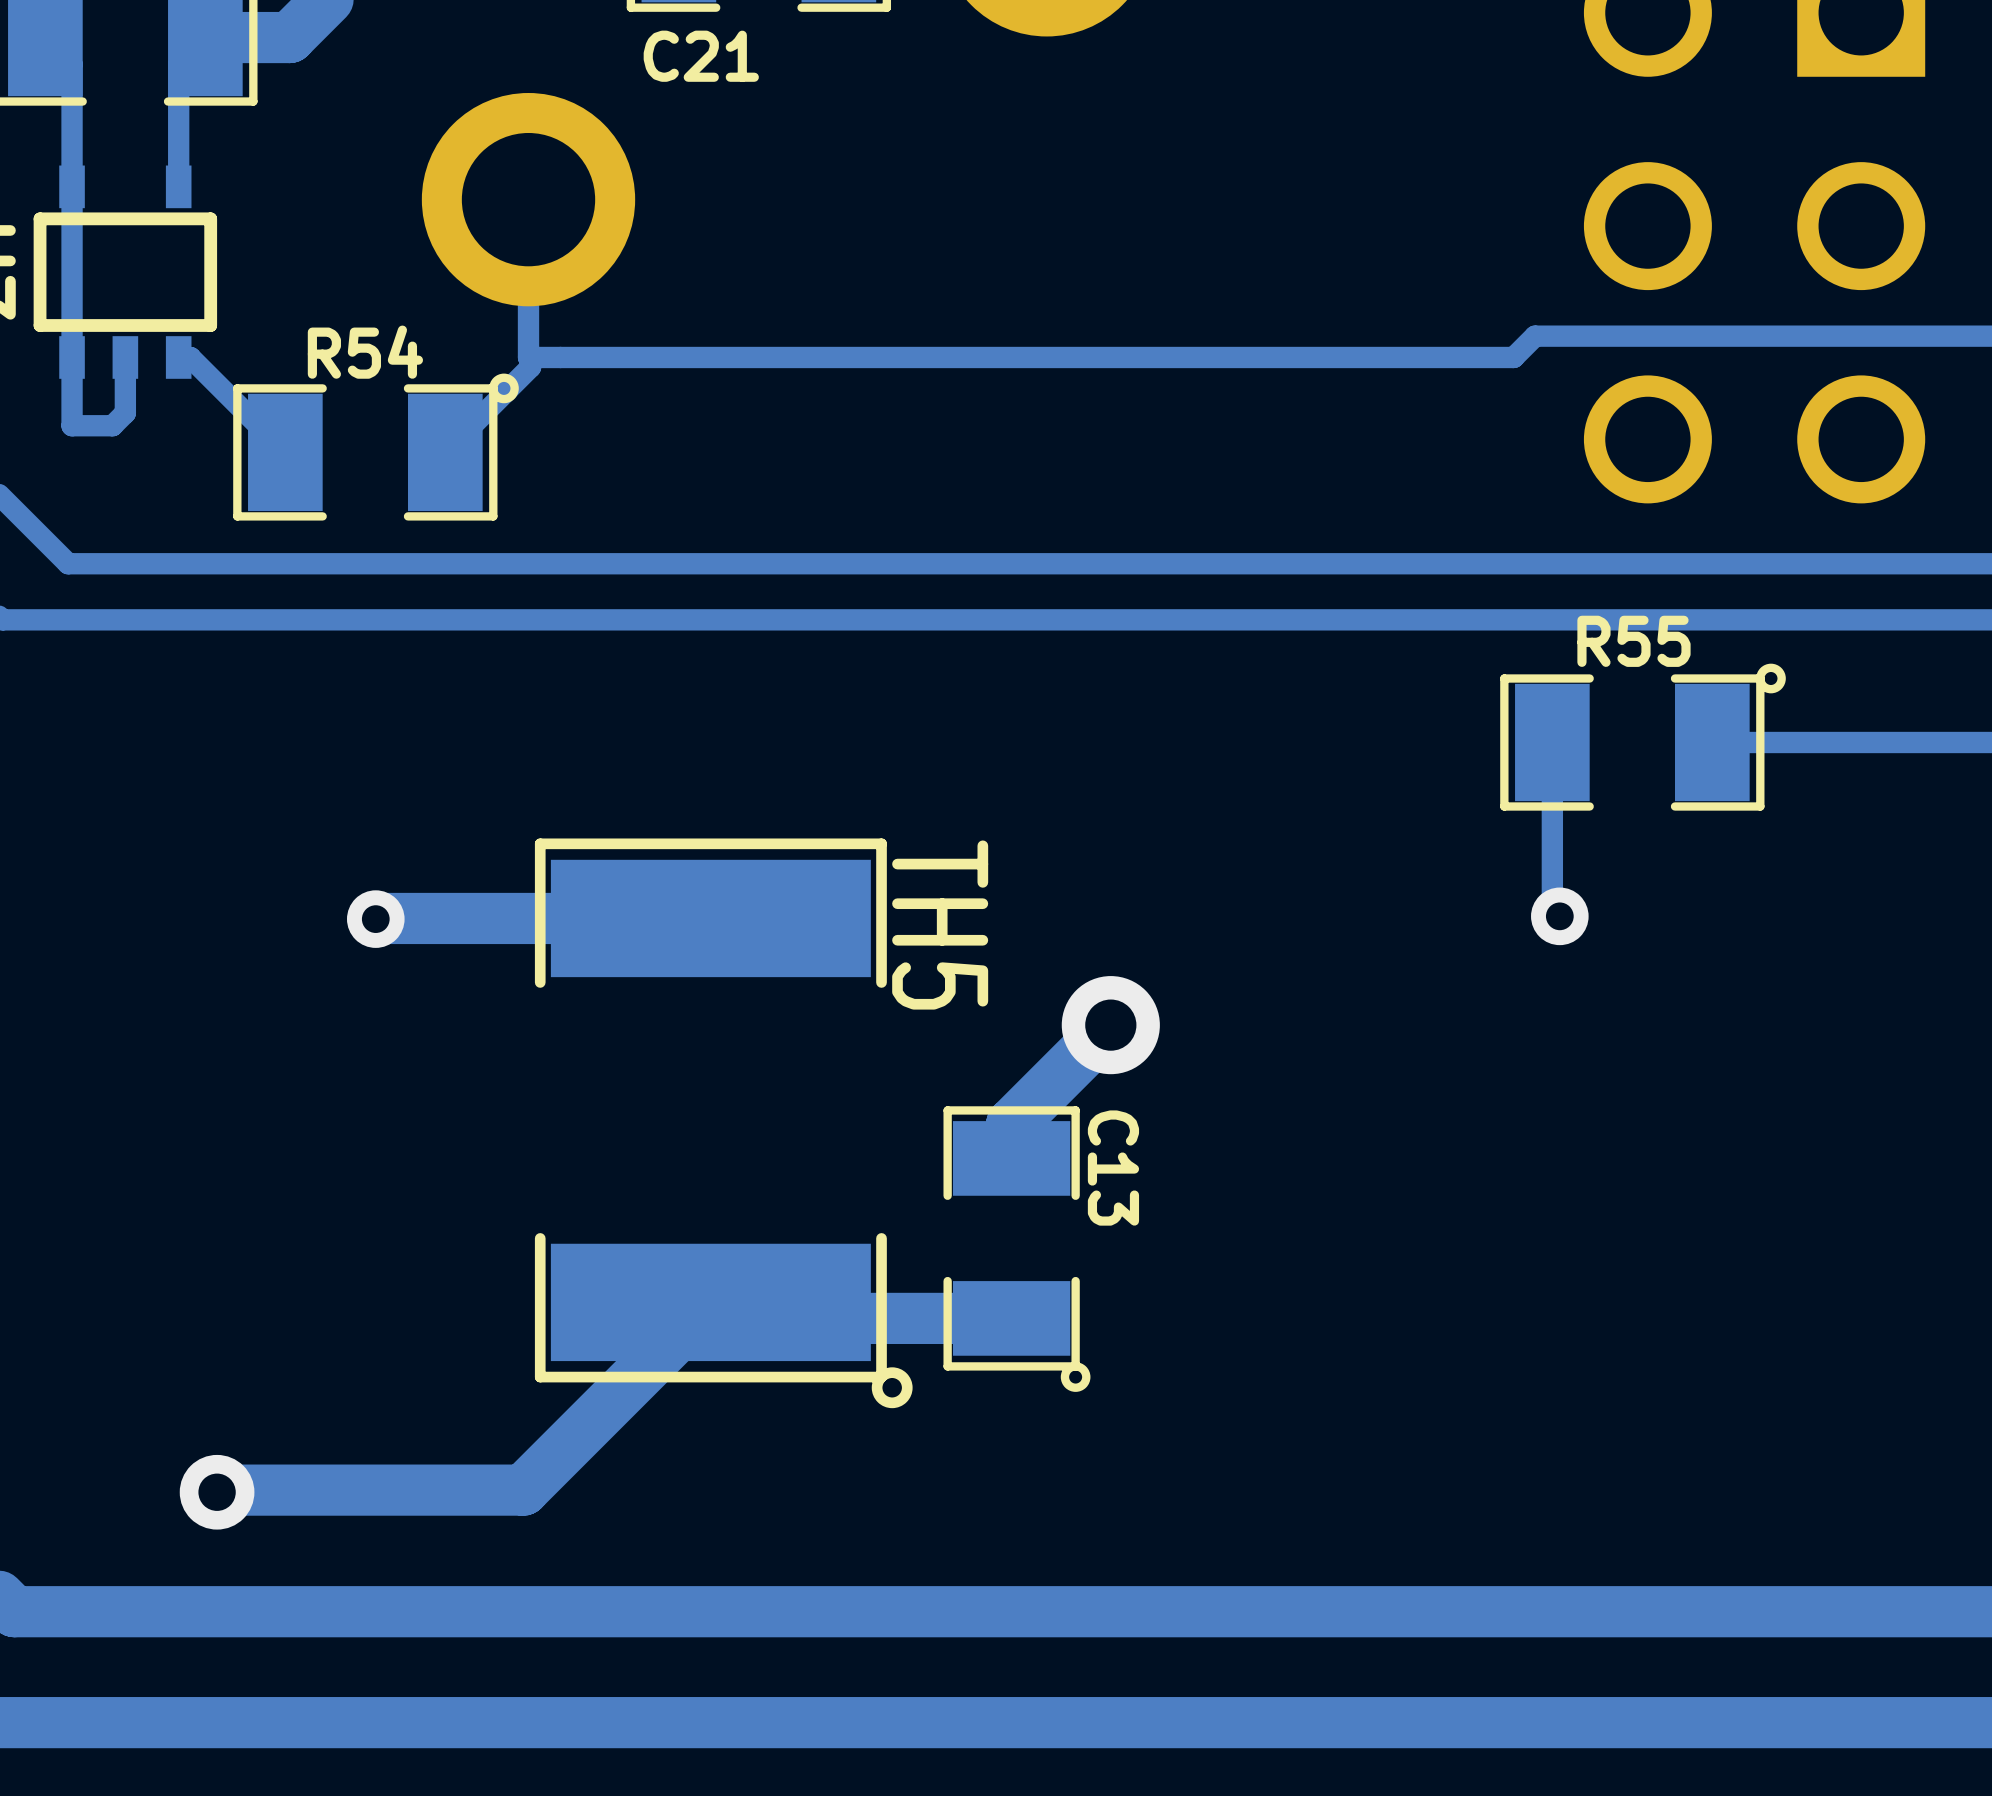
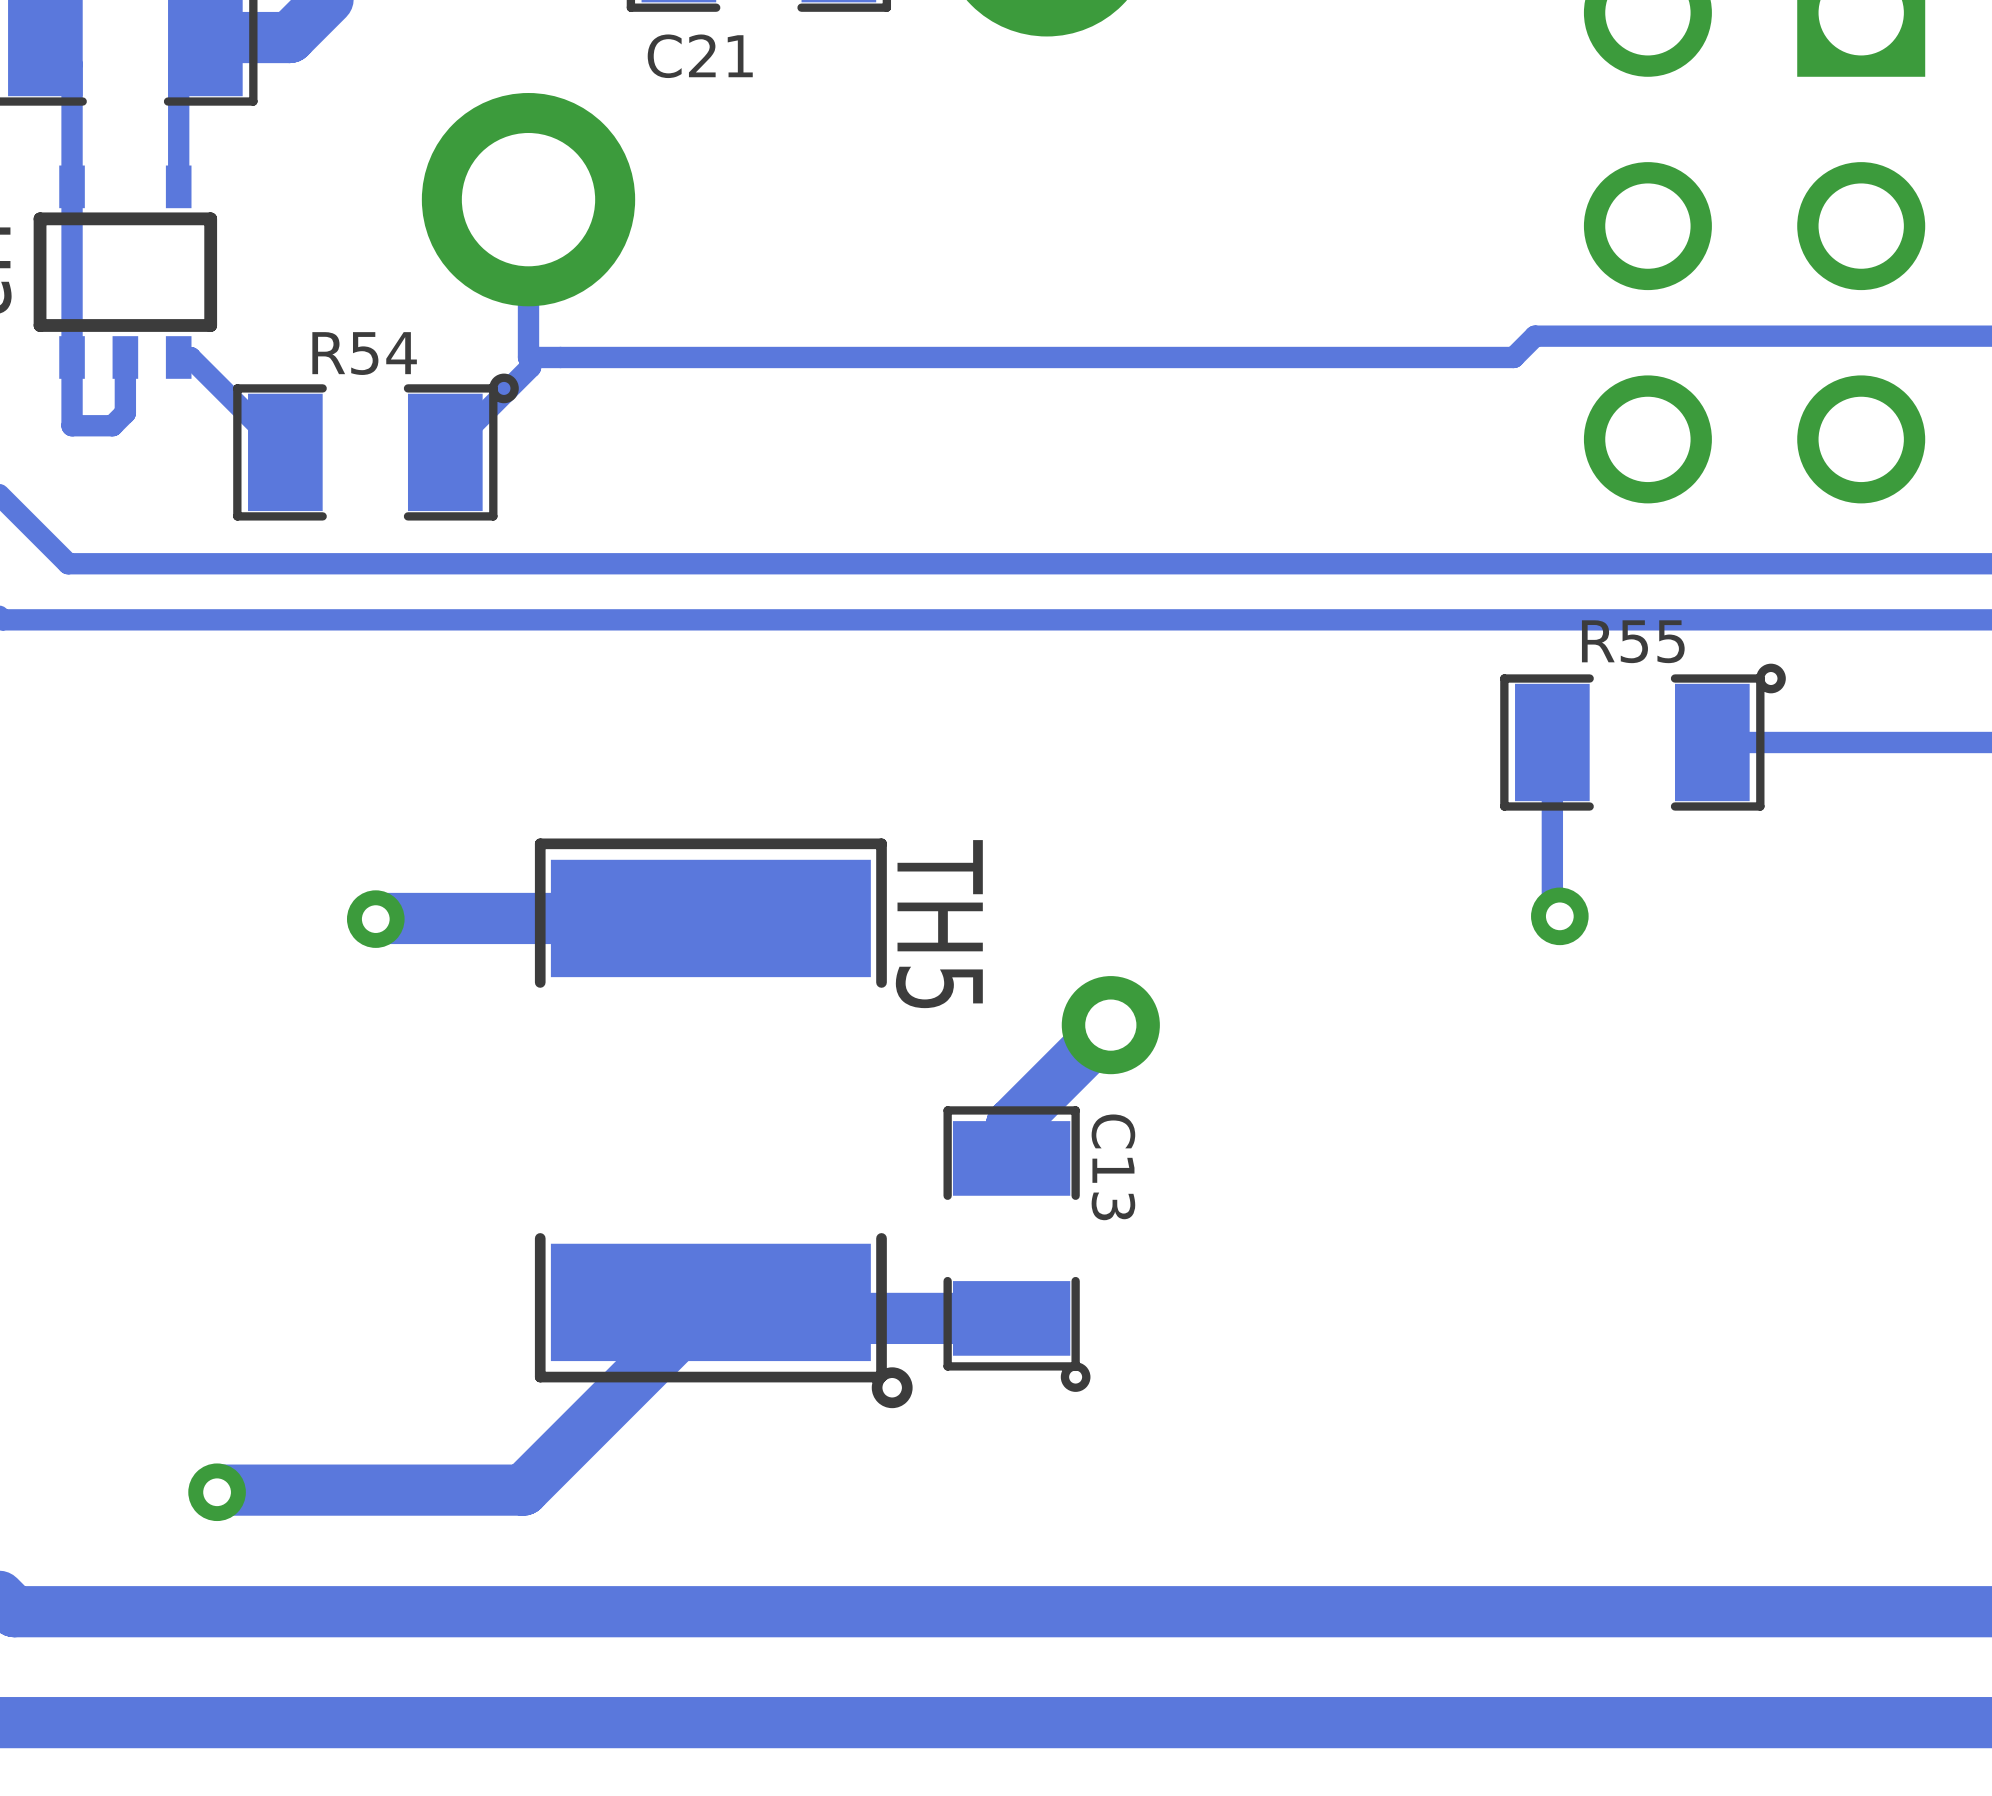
via size: [179, 1454, 255, 1530] -> [188, 1463, 246, 1522]

